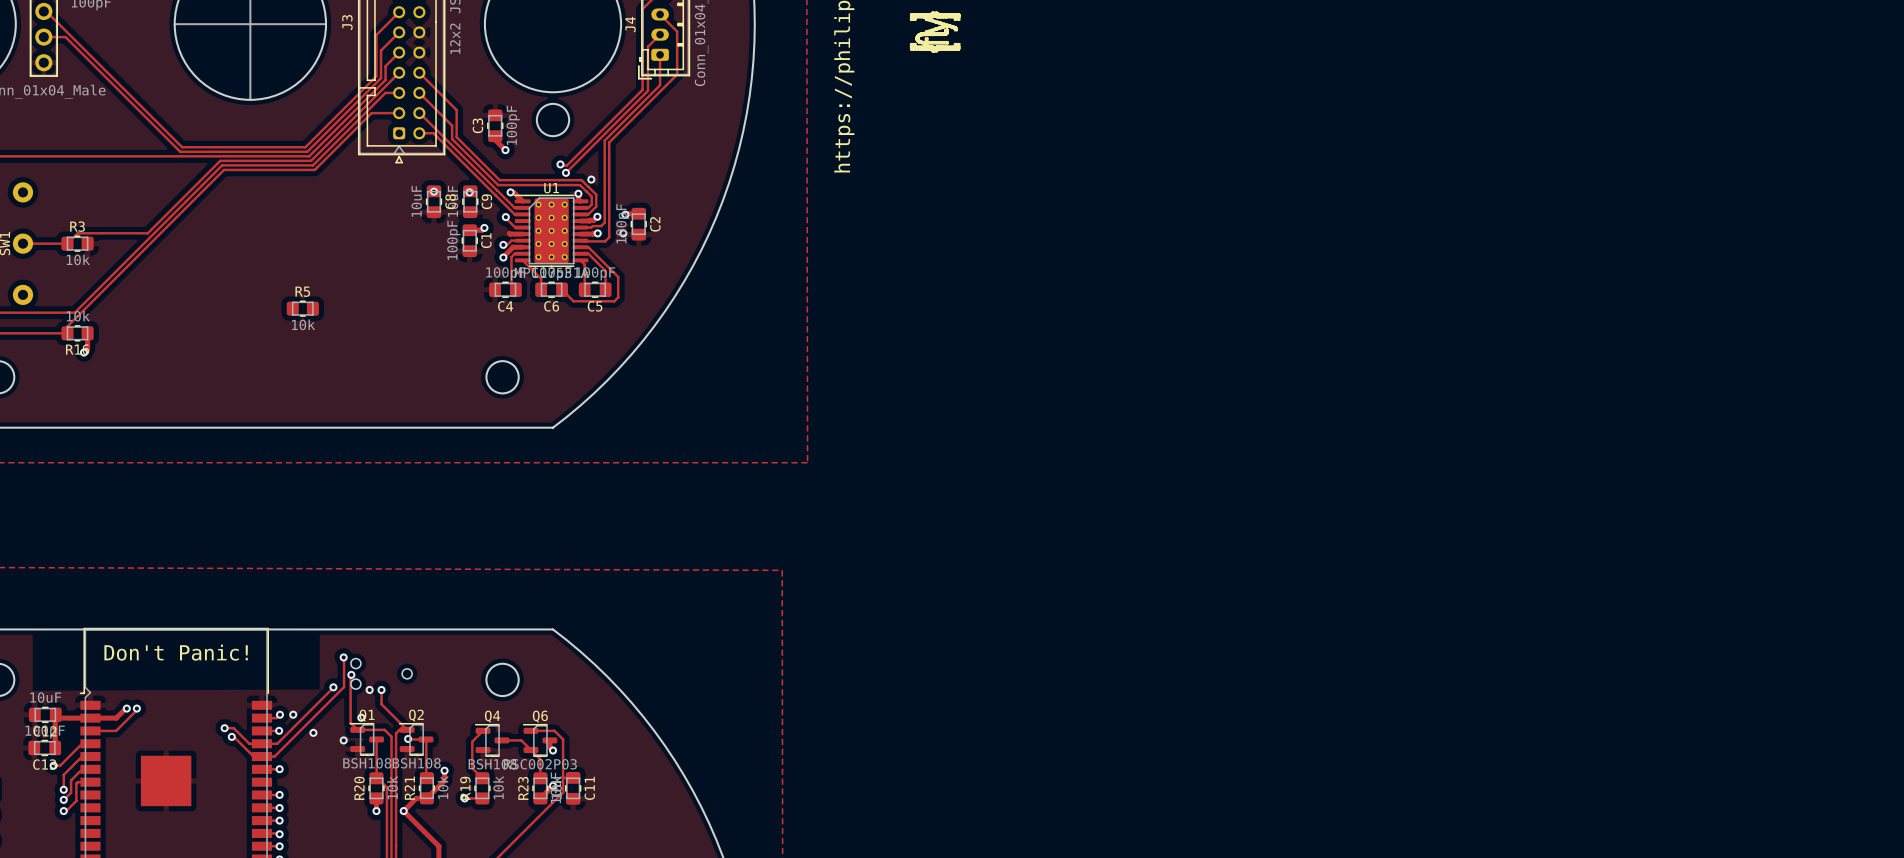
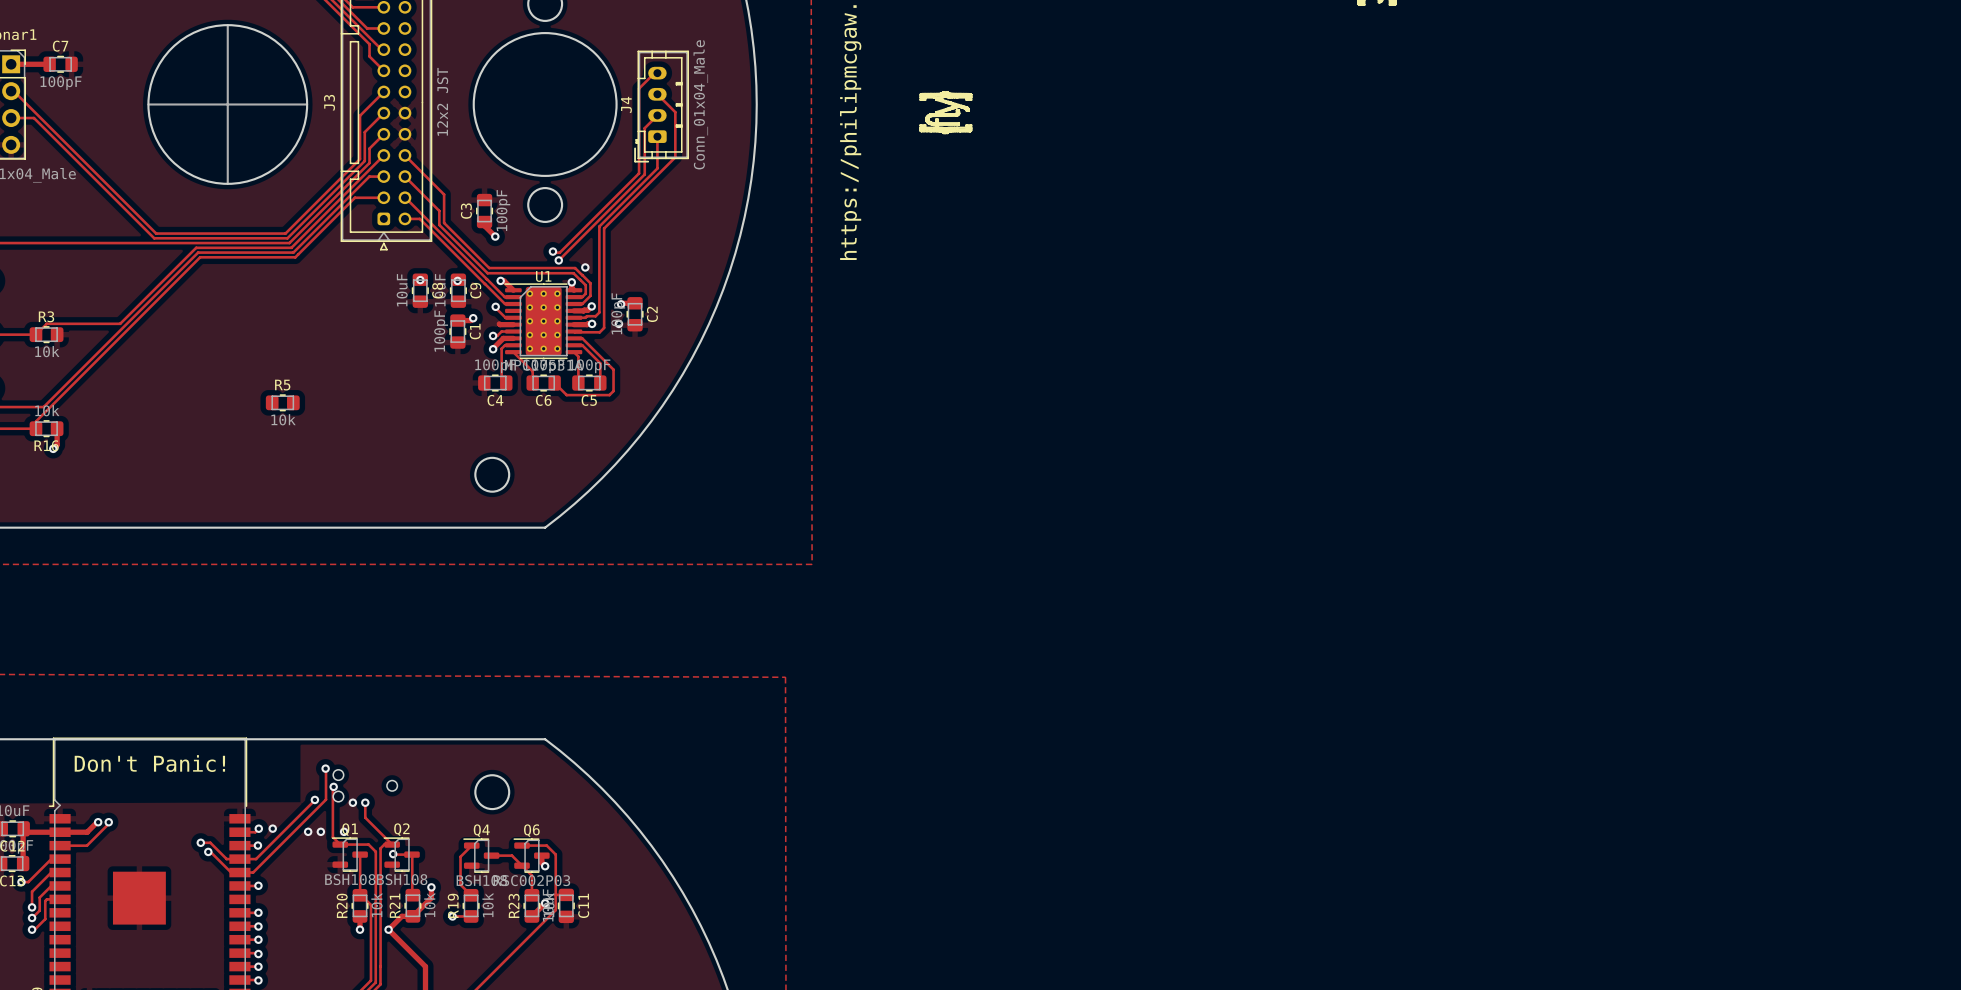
via: none -> (308, 831)
via: none -> (320, 831)
via: (313, 732) -> none
via: (343, 740) -> none

